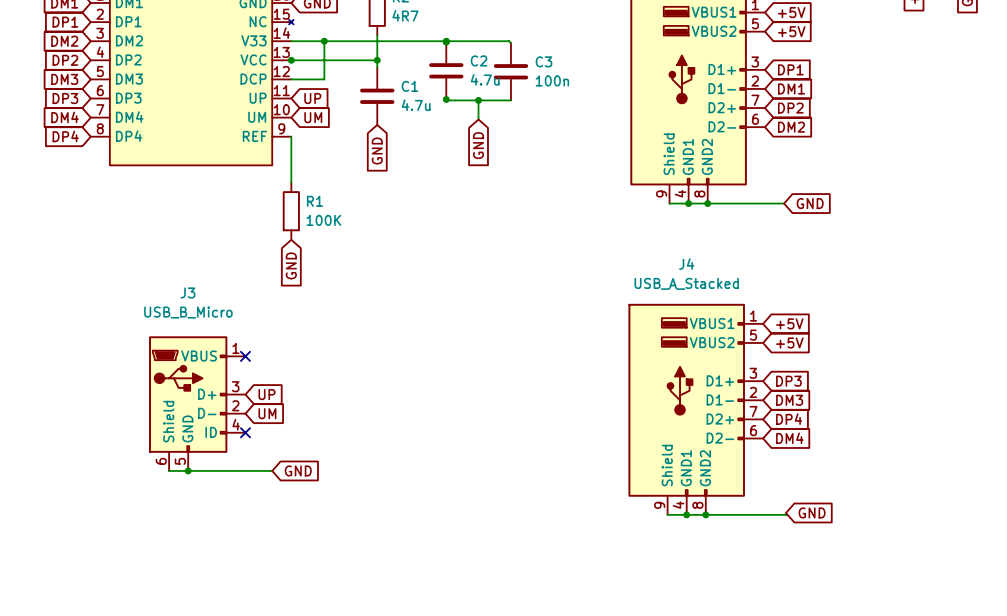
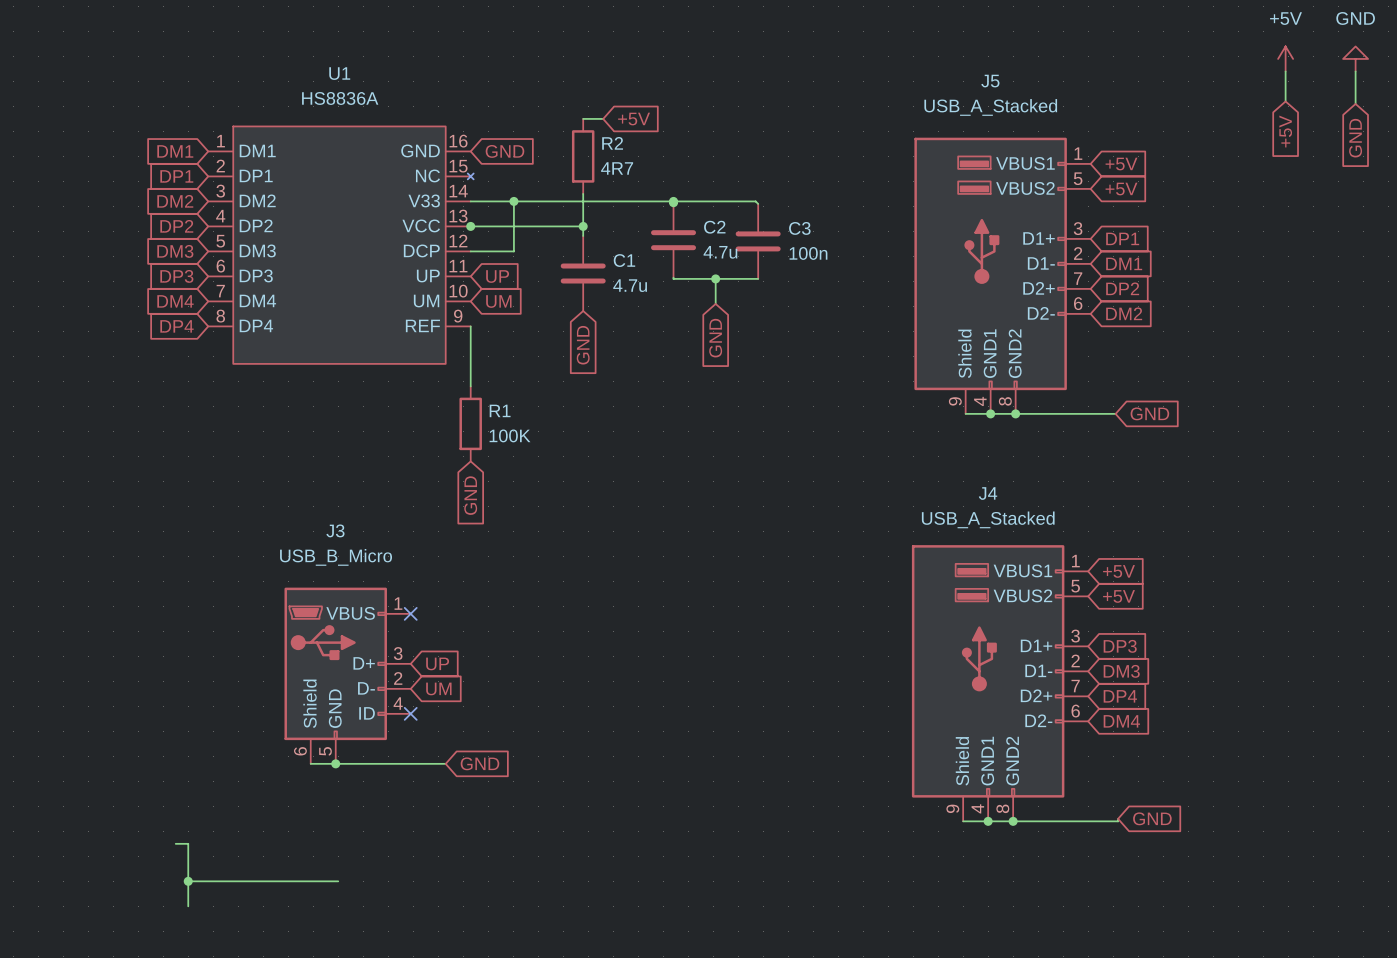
junction: (446, 99) -> none
wire: none -> (175, 843) (188, 843) (188, 906)
wire: none -> (188, 881) (338, 881)
junction: none -> (188, 881)

